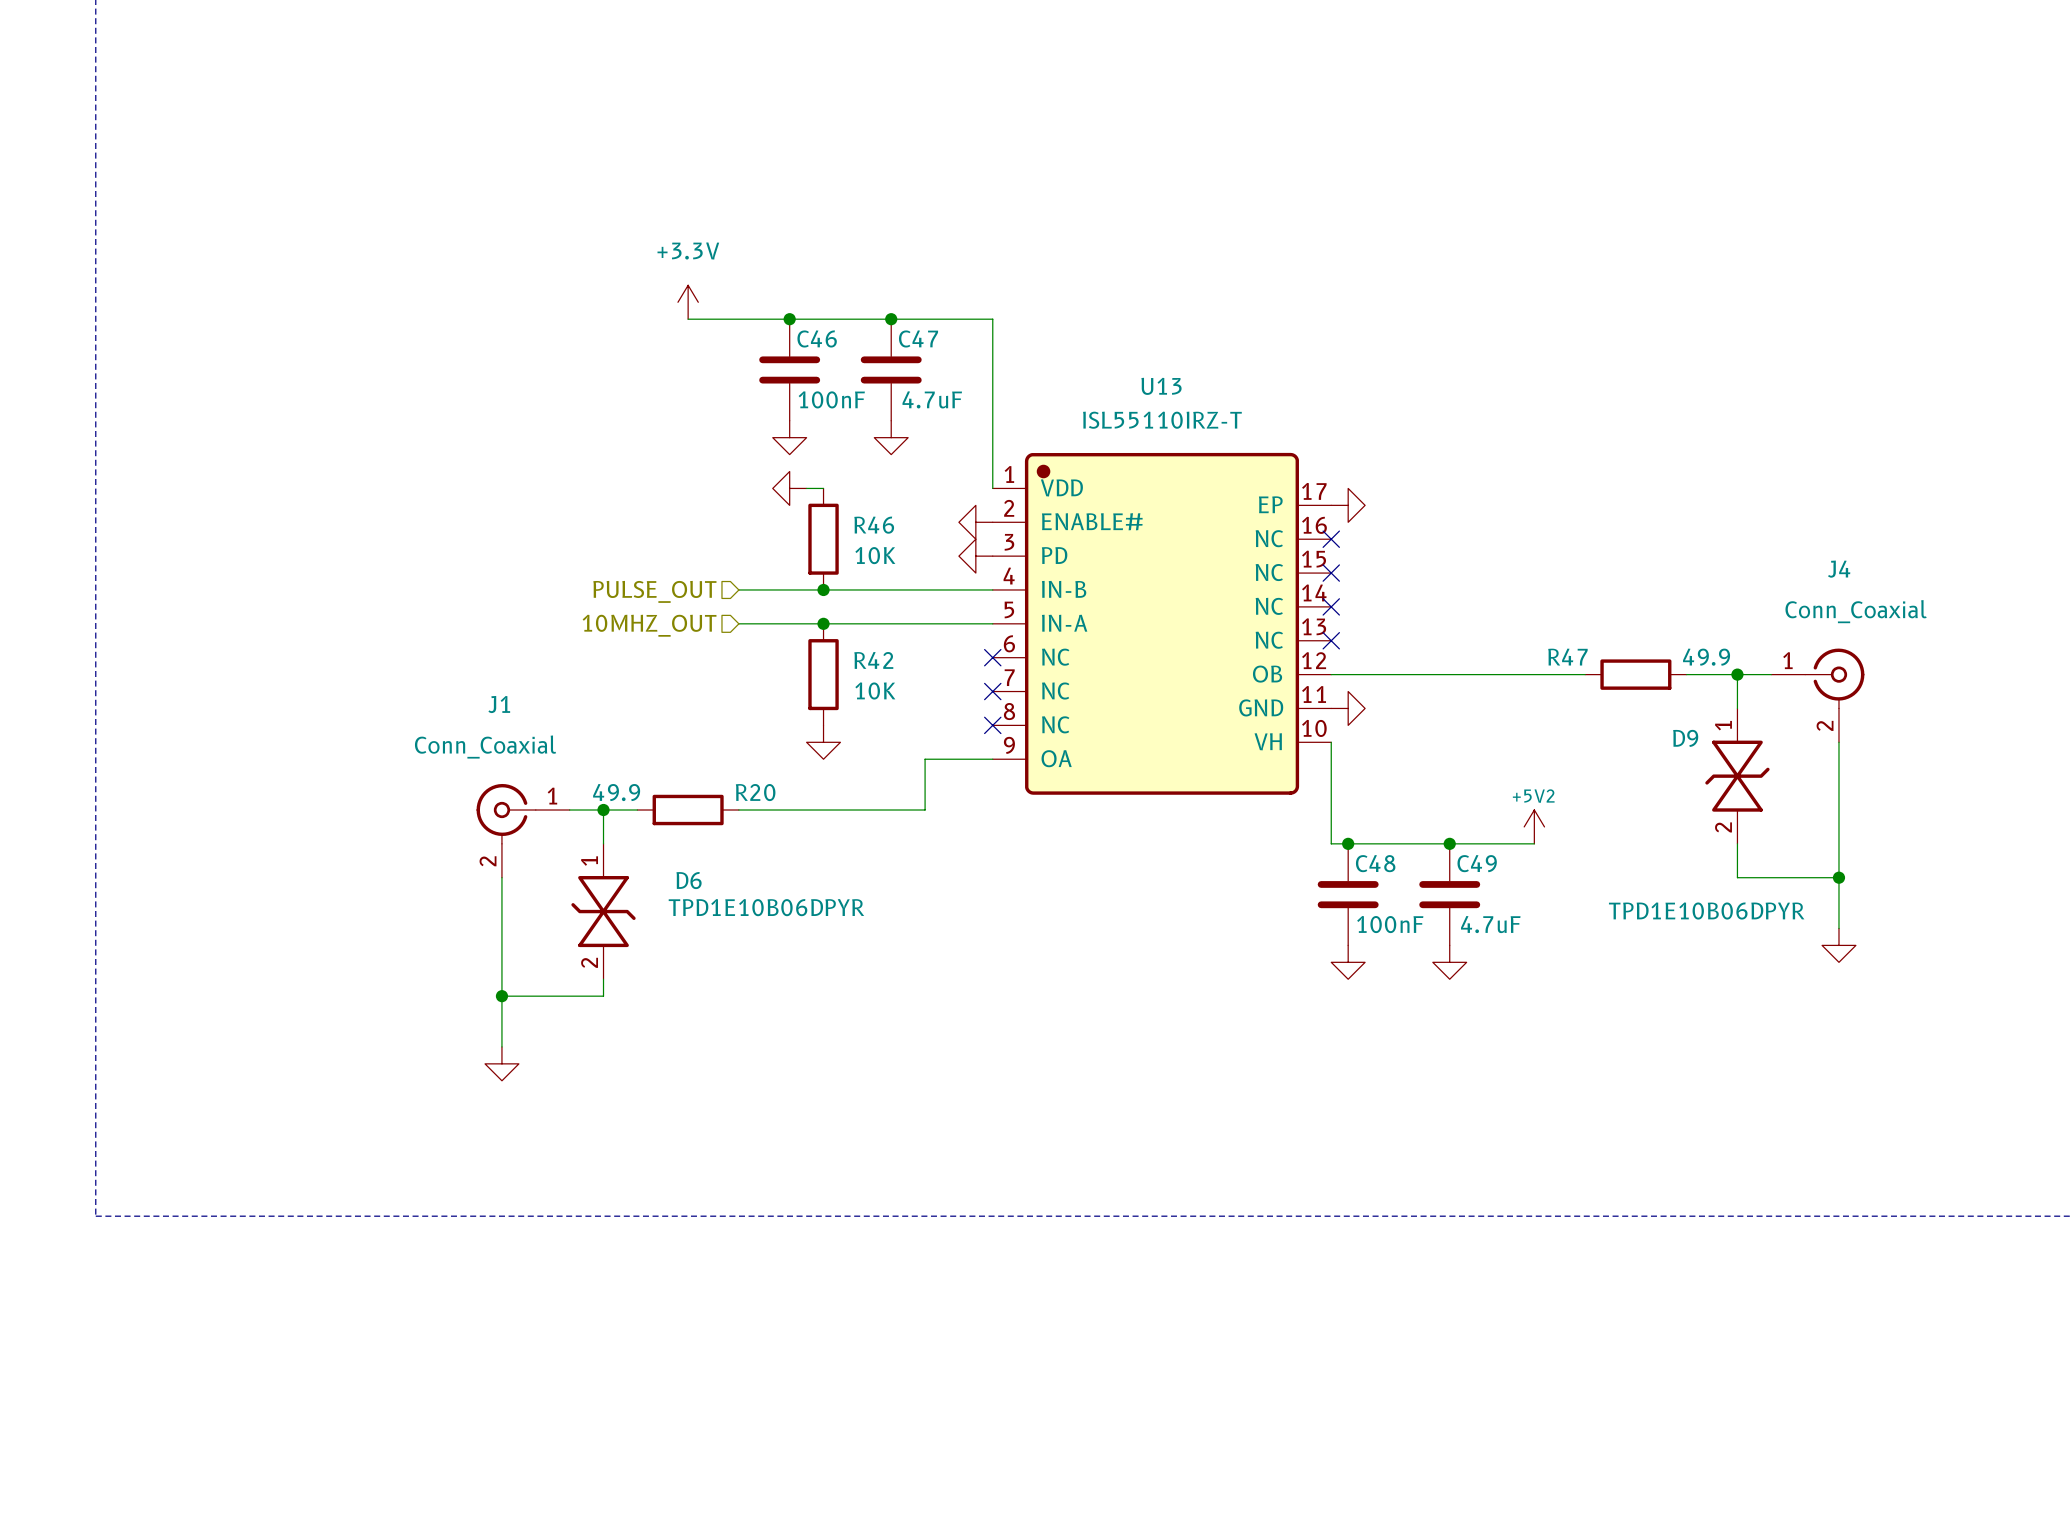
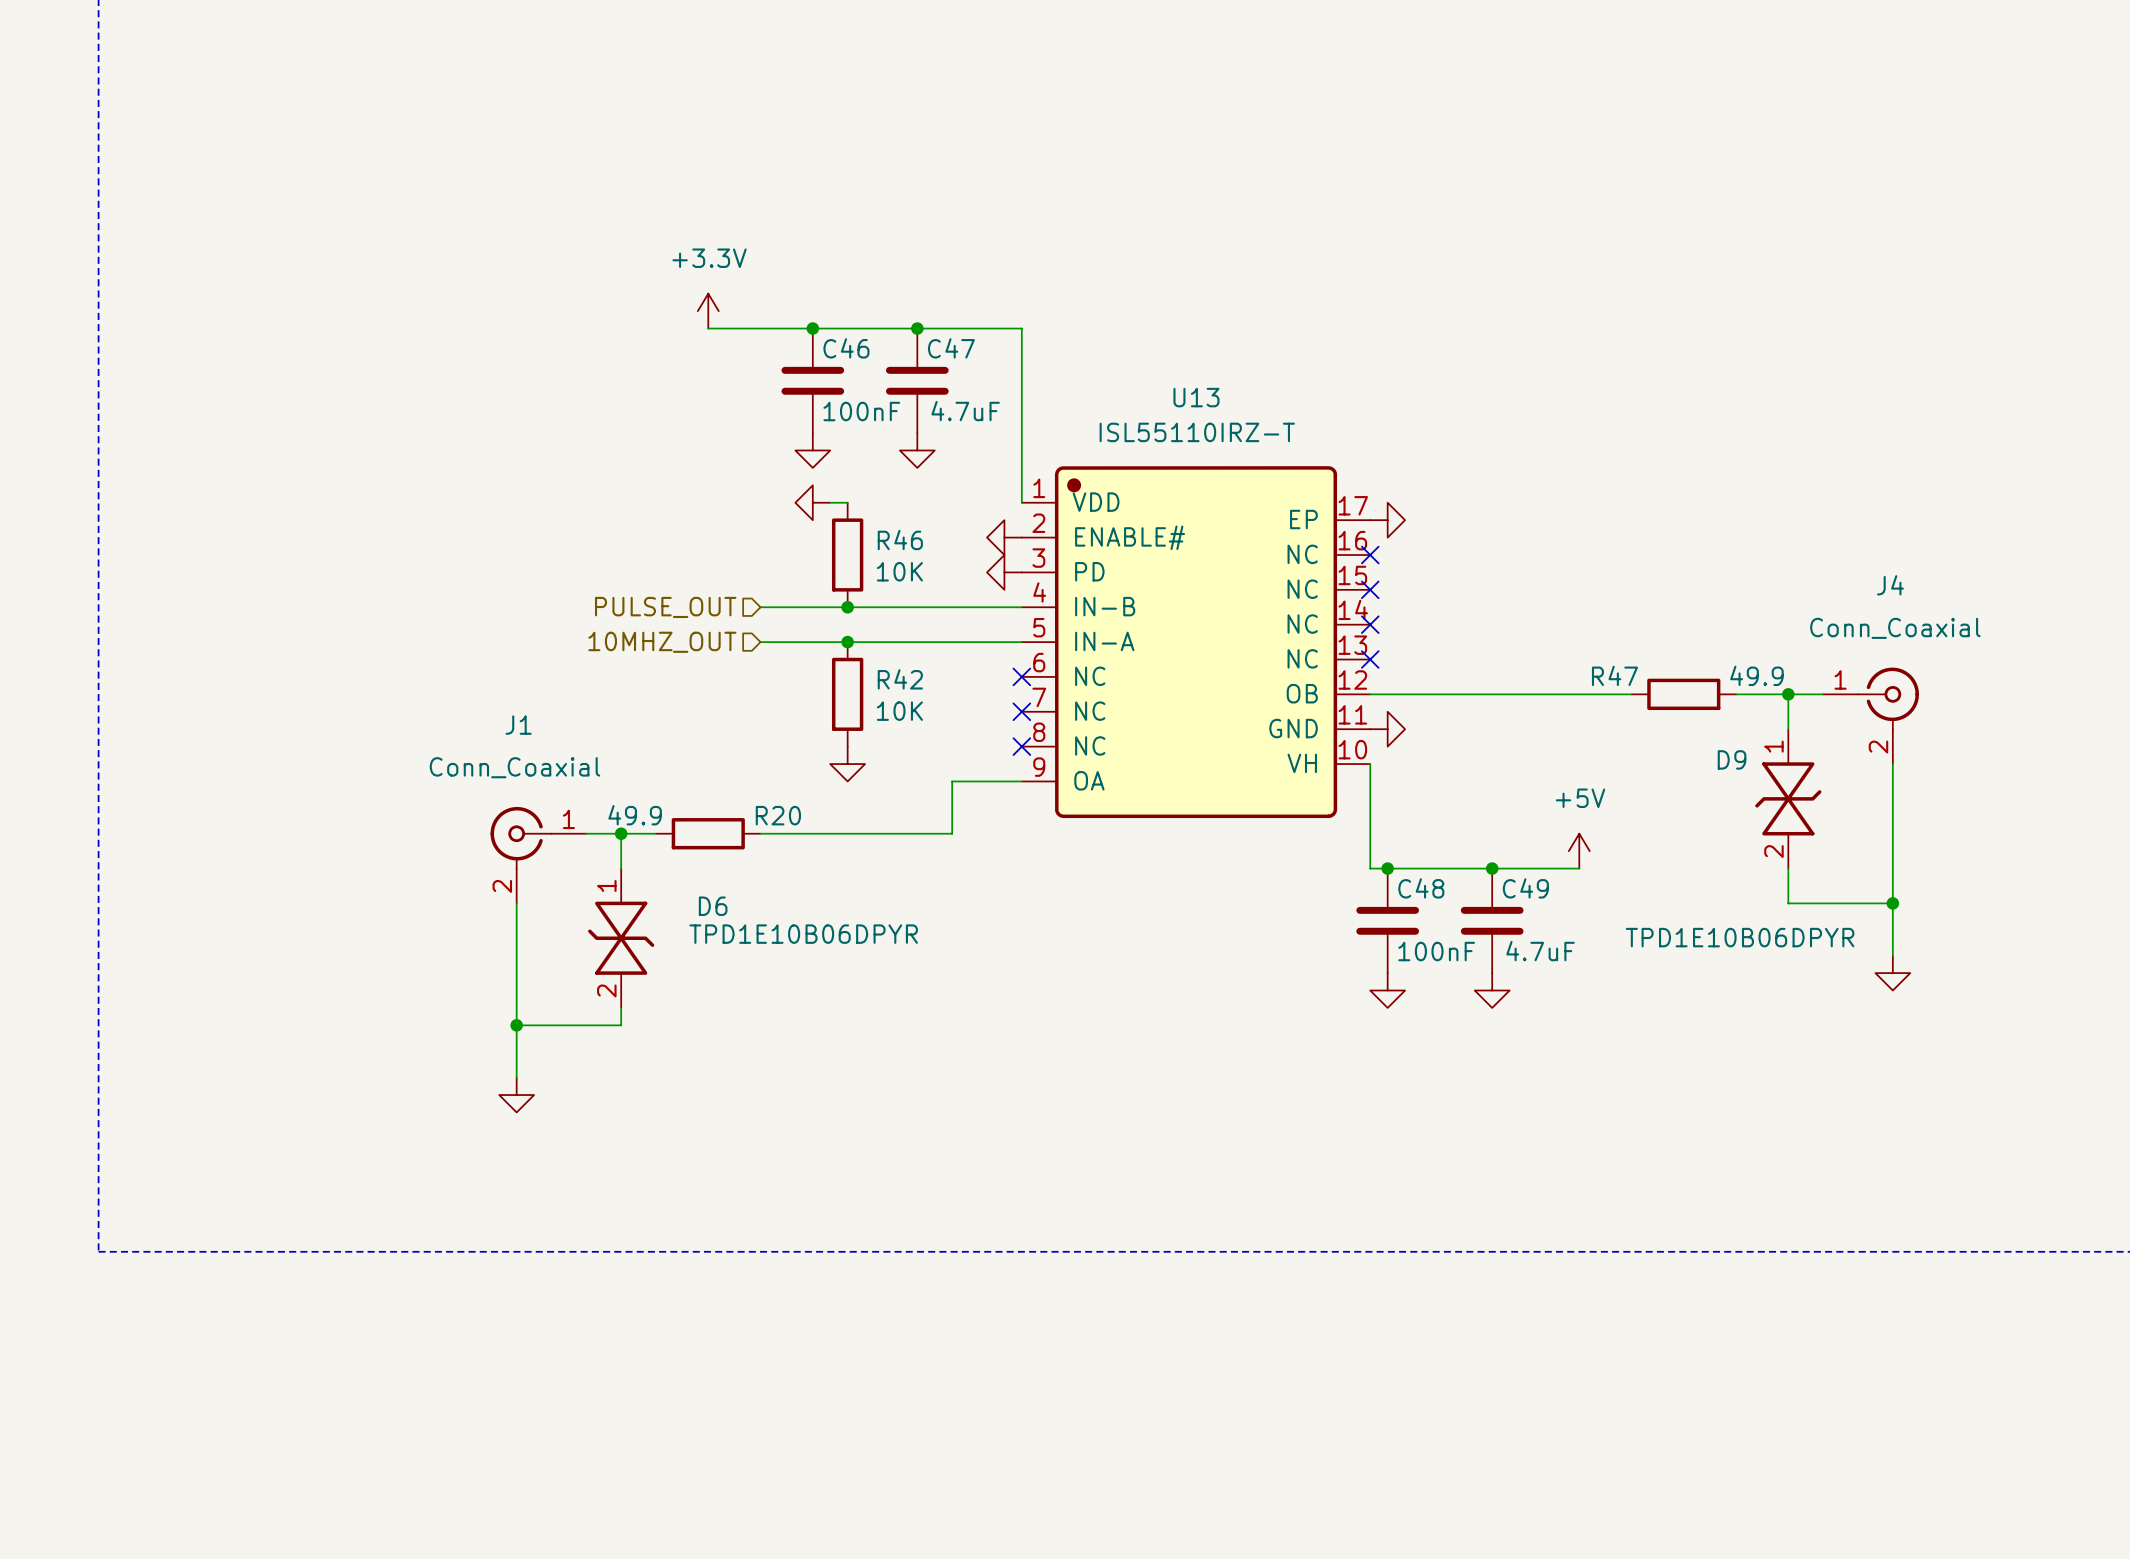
power symbol: +5V2 (1534, 826) -> +5V (1579, 851)

